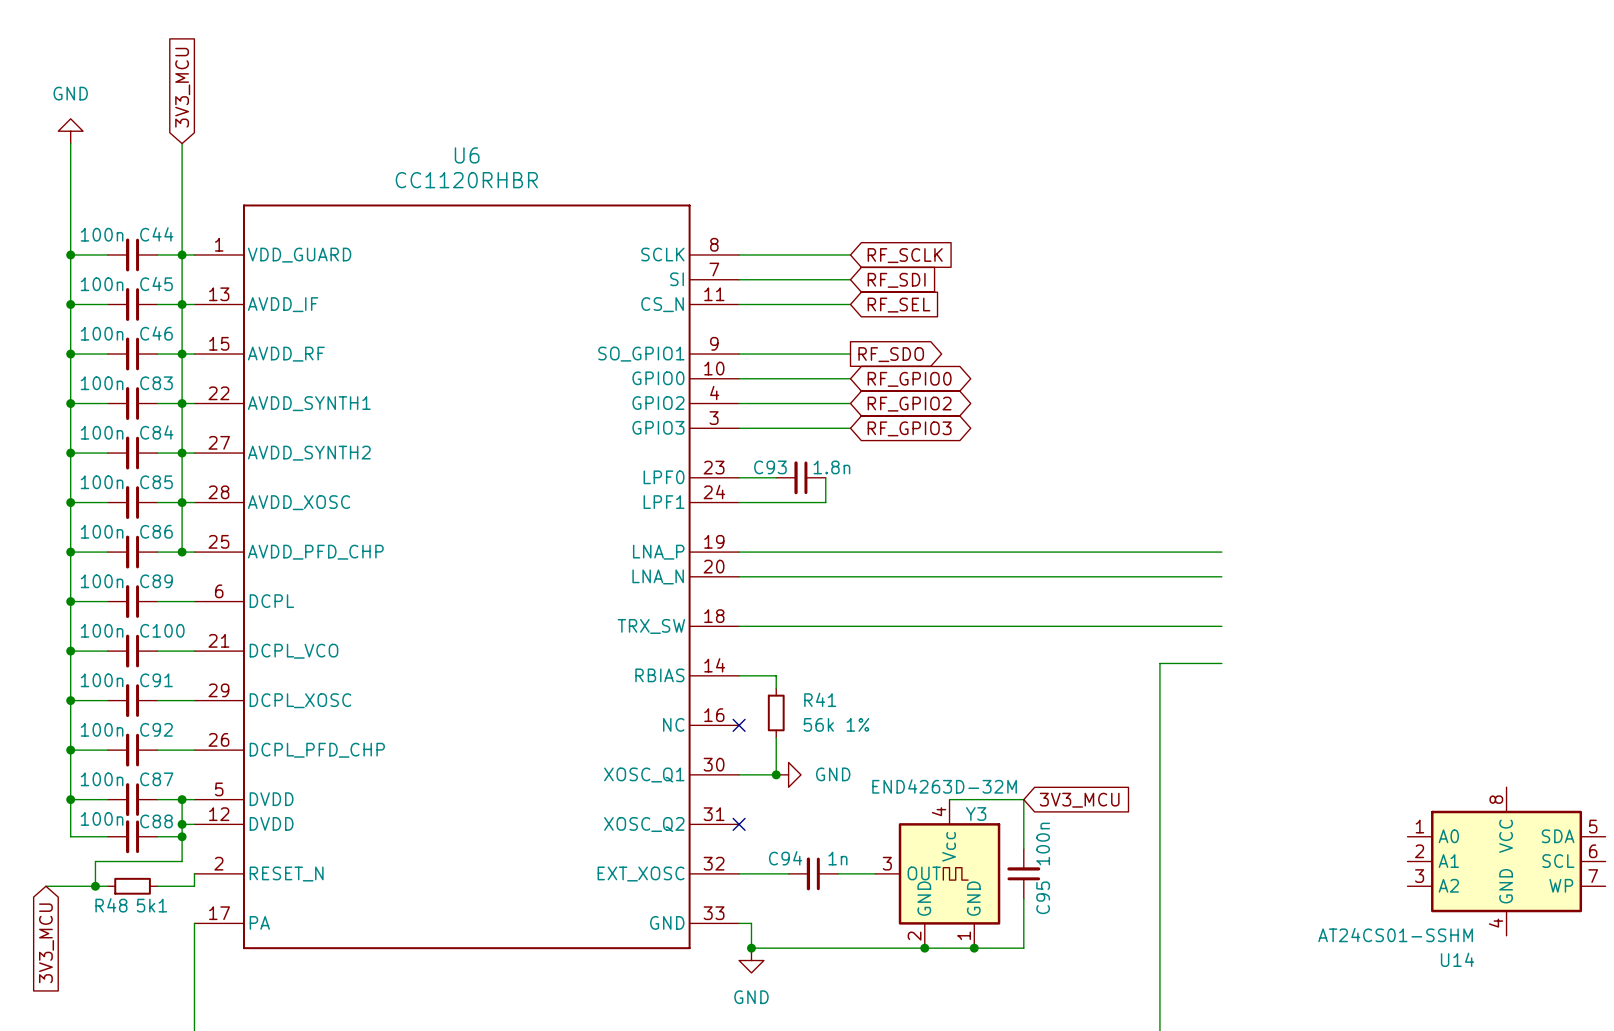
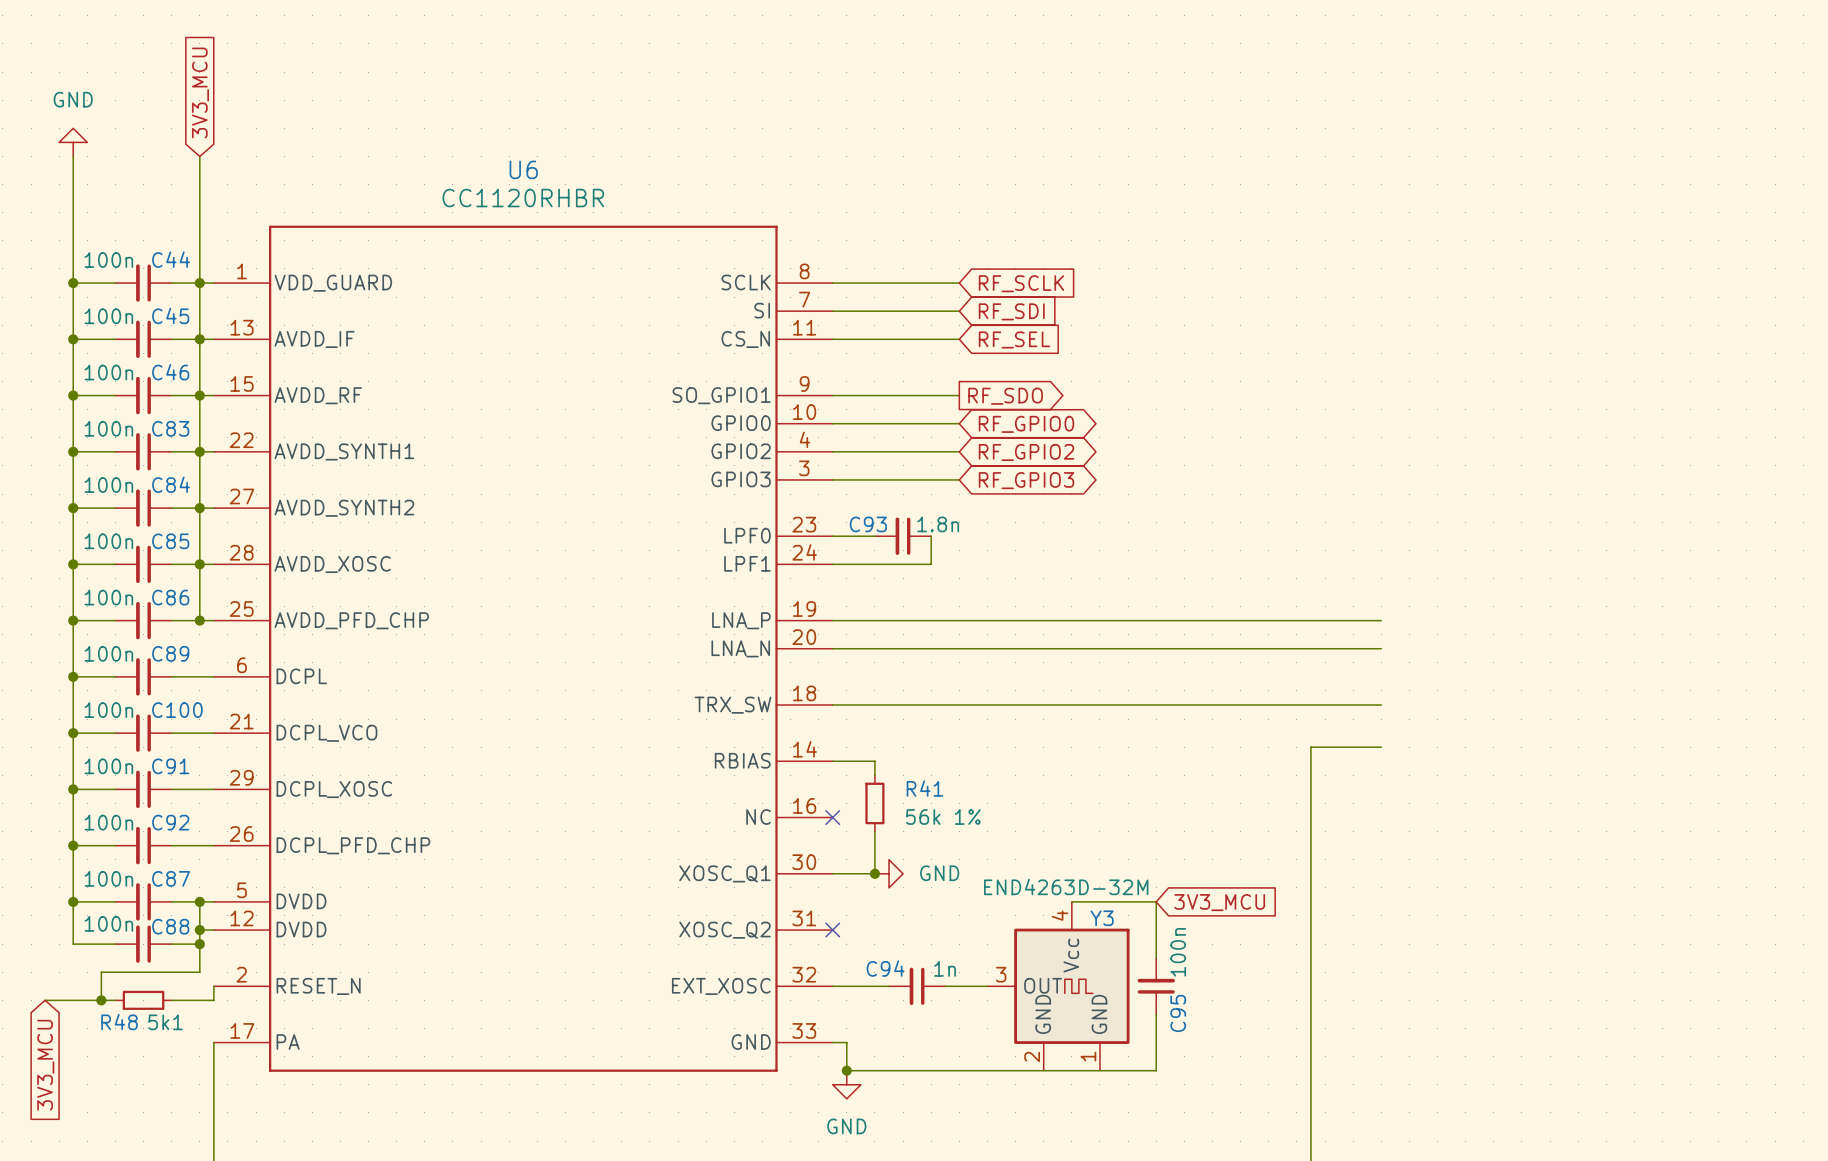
U14: AT24CS01-SSHM (1506, 861) -> none
junction: (924, 948) -> none
junction: (974, 948) -> none

